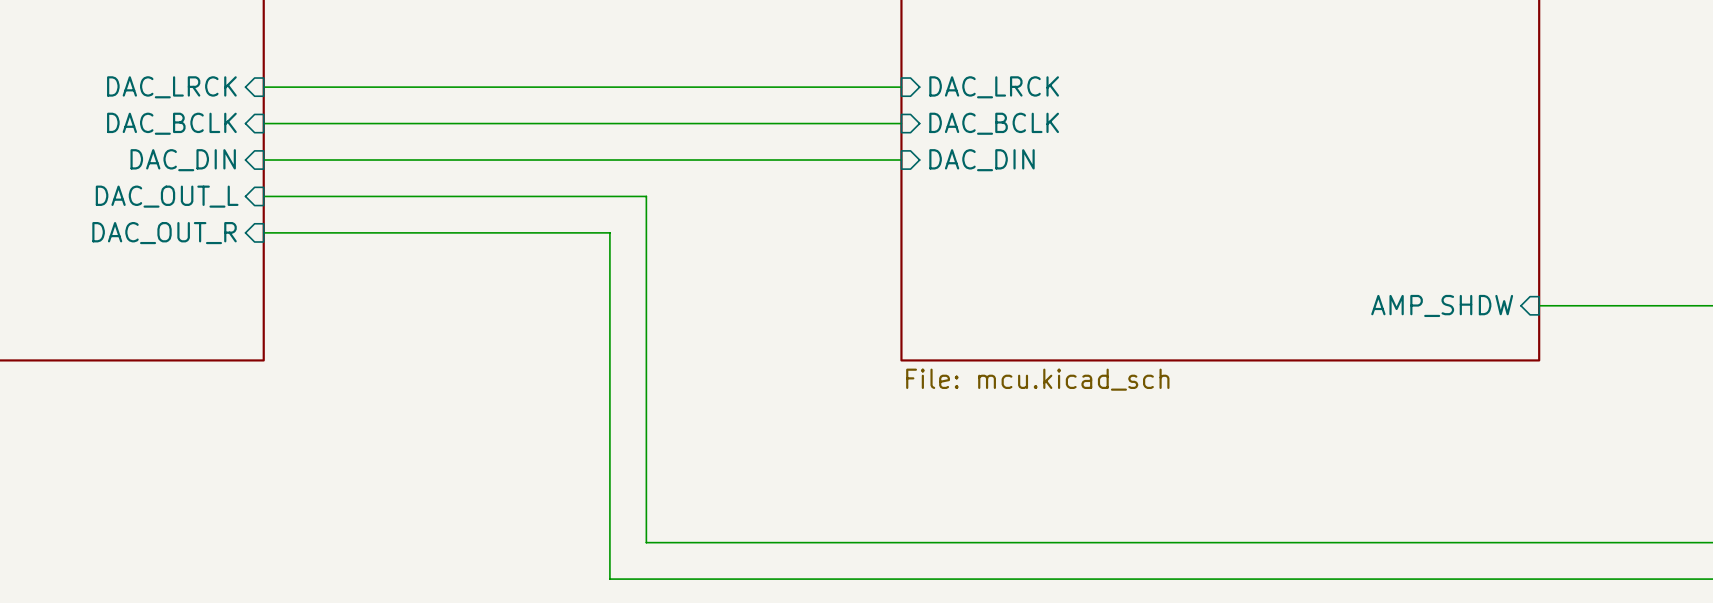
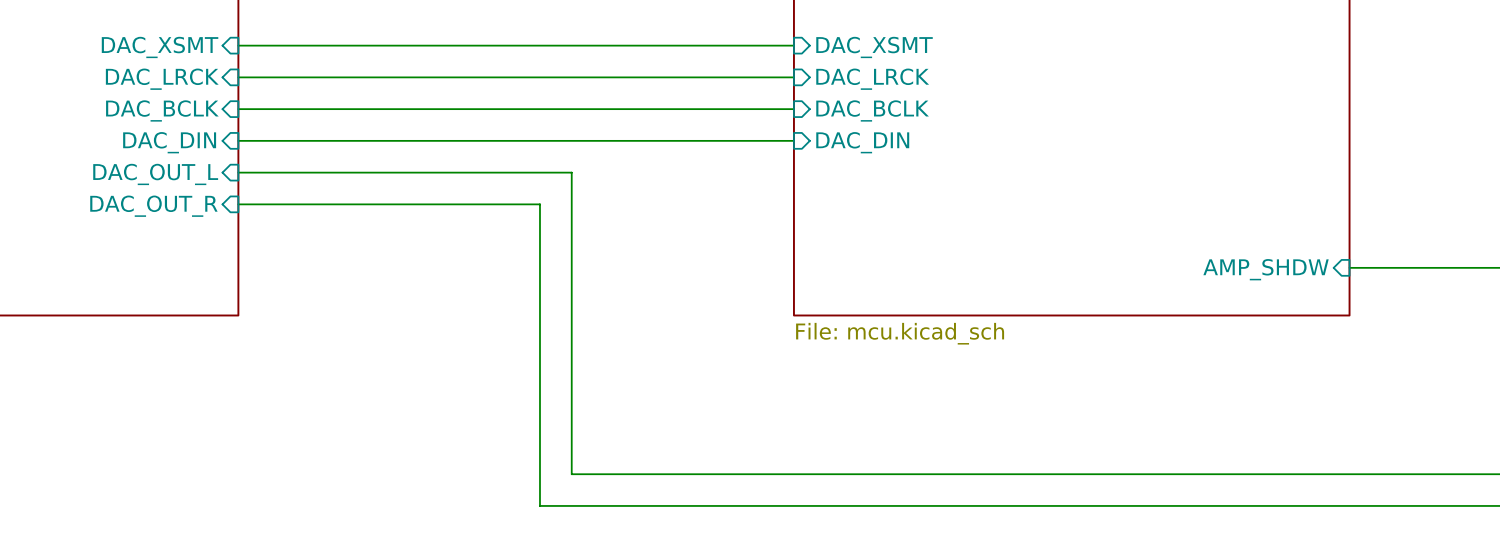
sheet pin: none -> DAC_XSMT (160, 47)
wire: none -> (238, 45) (793, 45)
sheet pin: none -> DAC_XSMT (874, 47)

